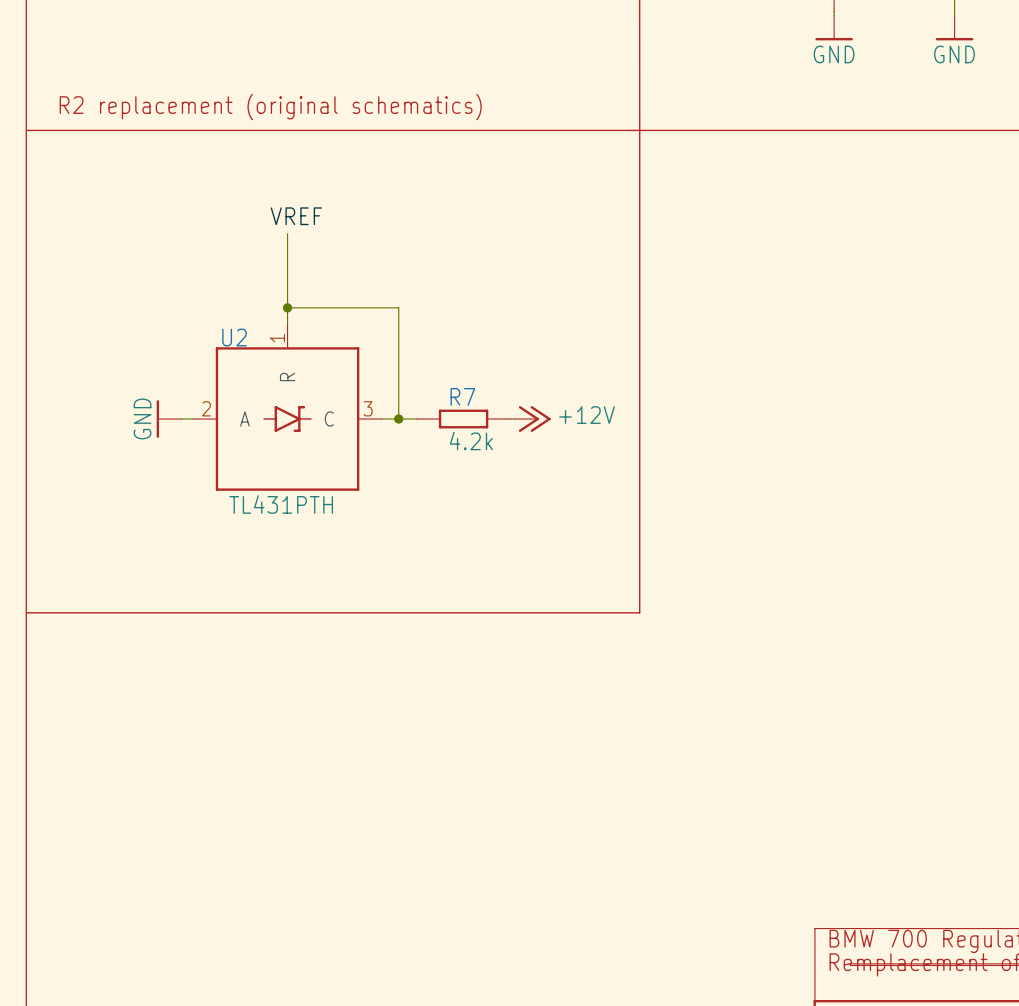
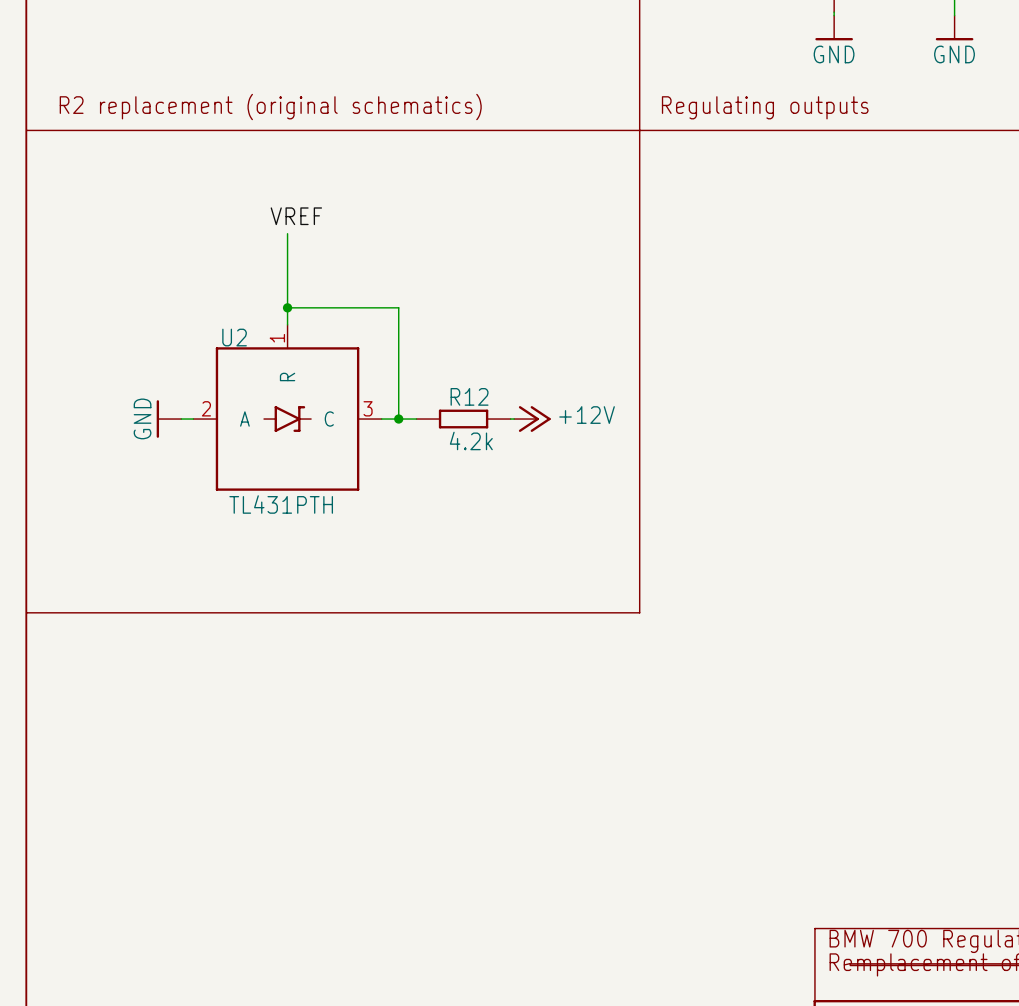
text: none -> Regulating outputs (765, 107)
R7 name: R7 (462, 396) -> R12 (469, 396)

